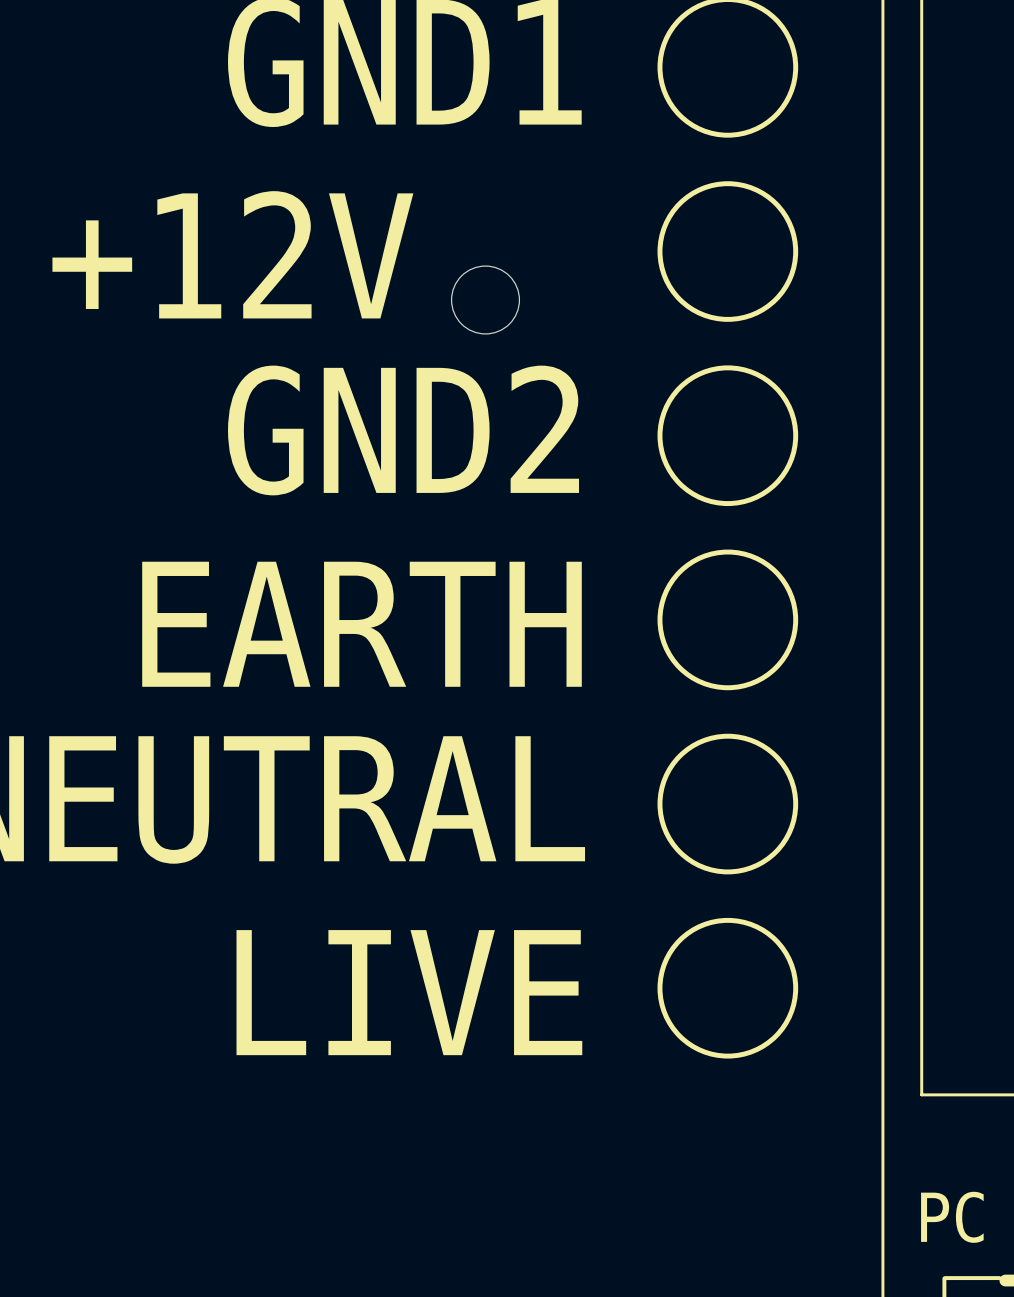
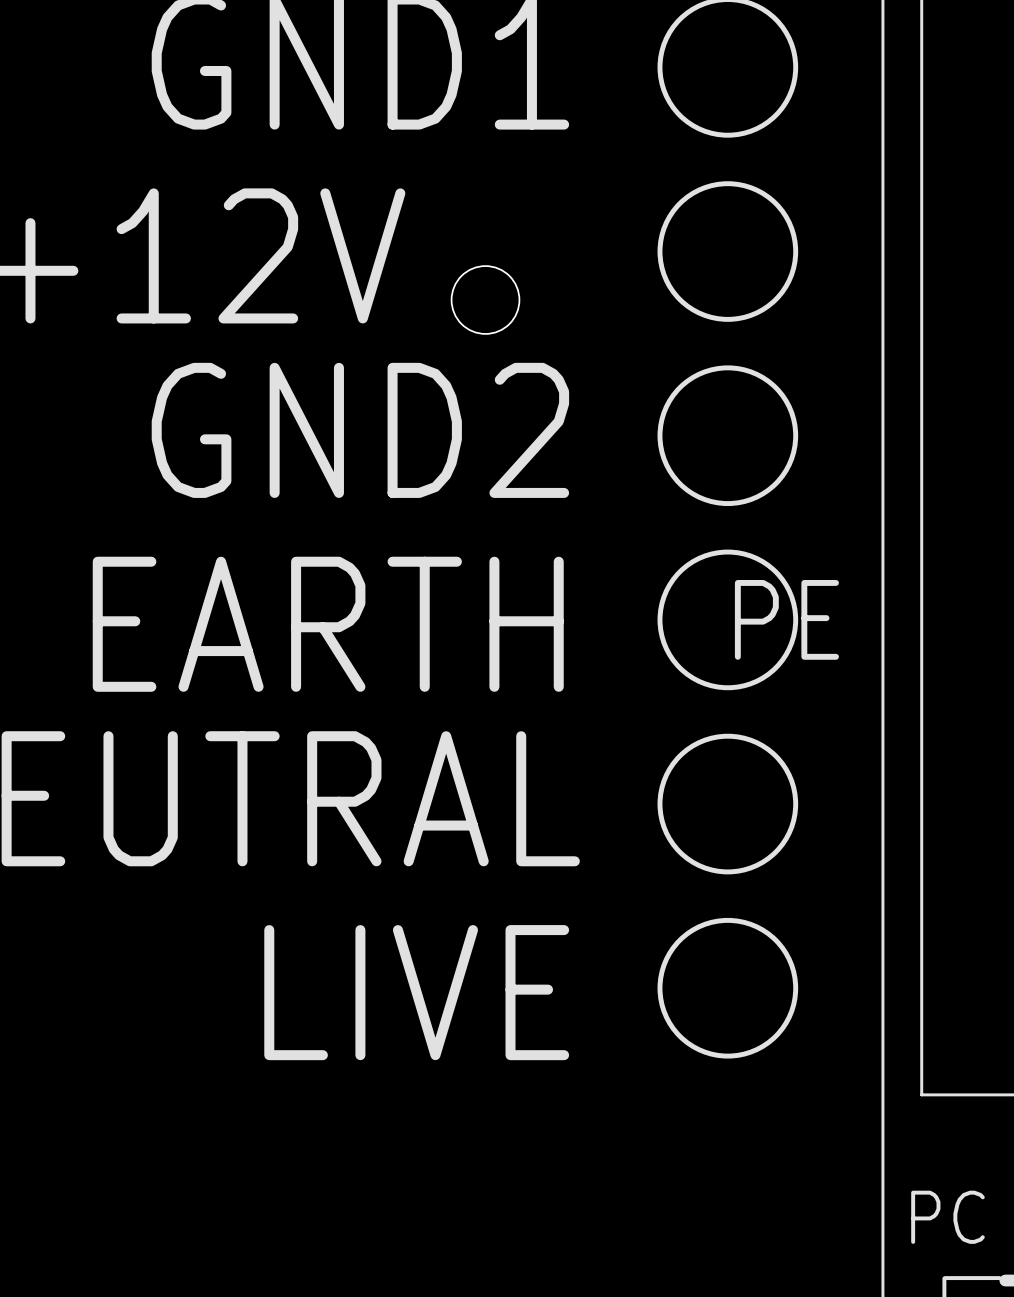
text: none -> PE (786, 619)

